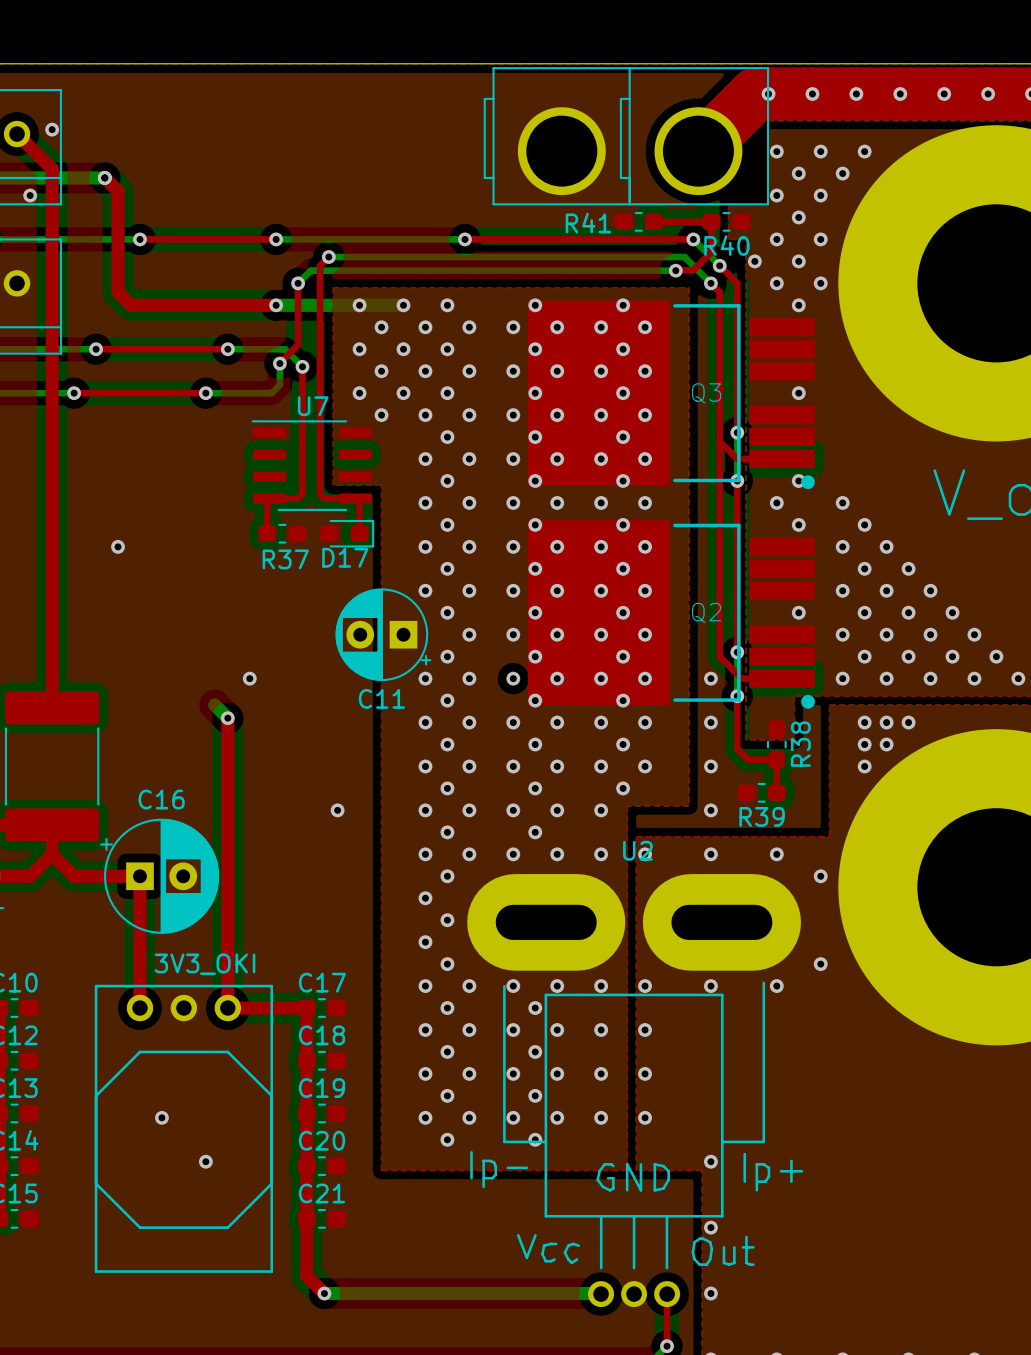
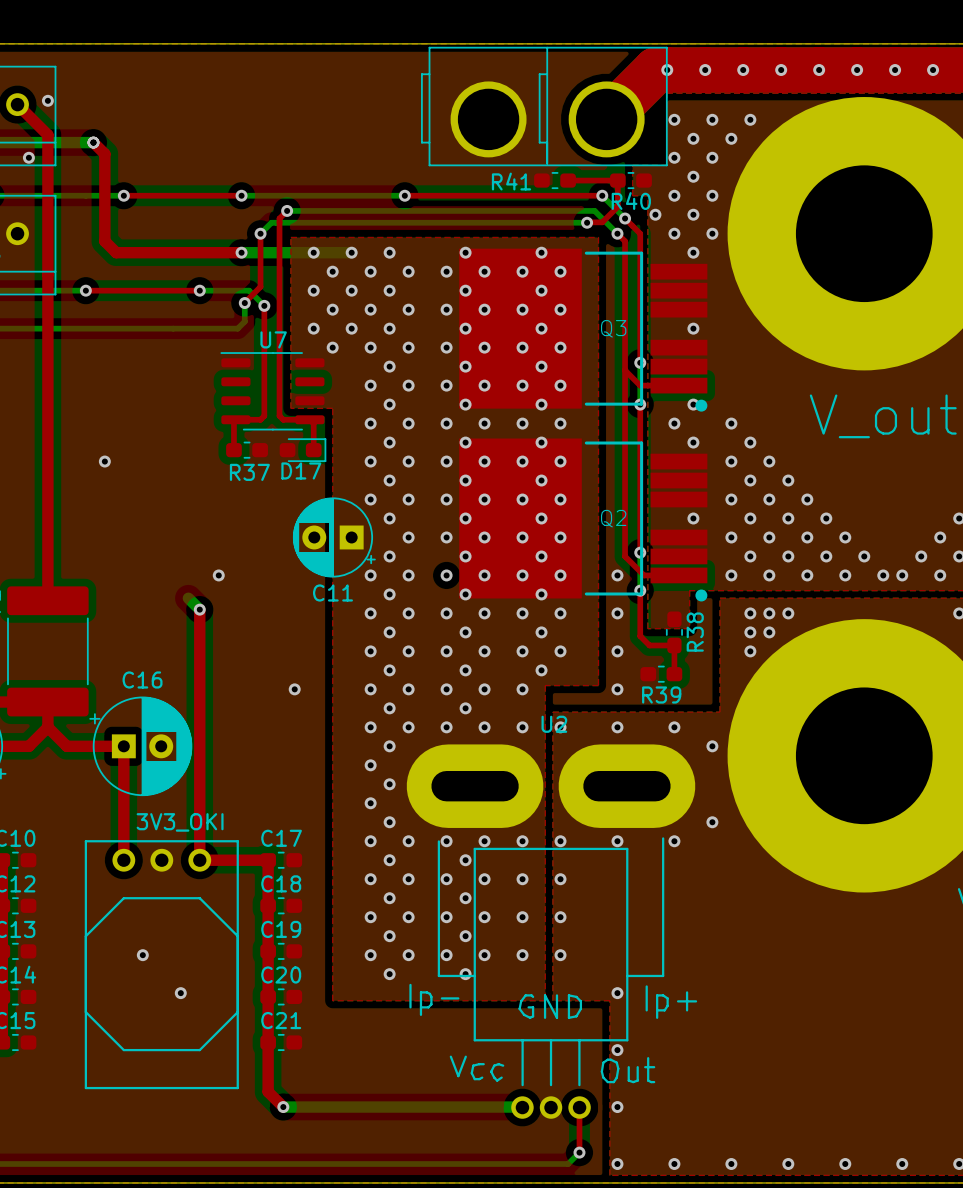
top track: (74, 393) (205, 393) -> none
bottom track: none -> (66, 328) (180, 328)
via: (74, 393) -> none
via: (205, 393) -> none

